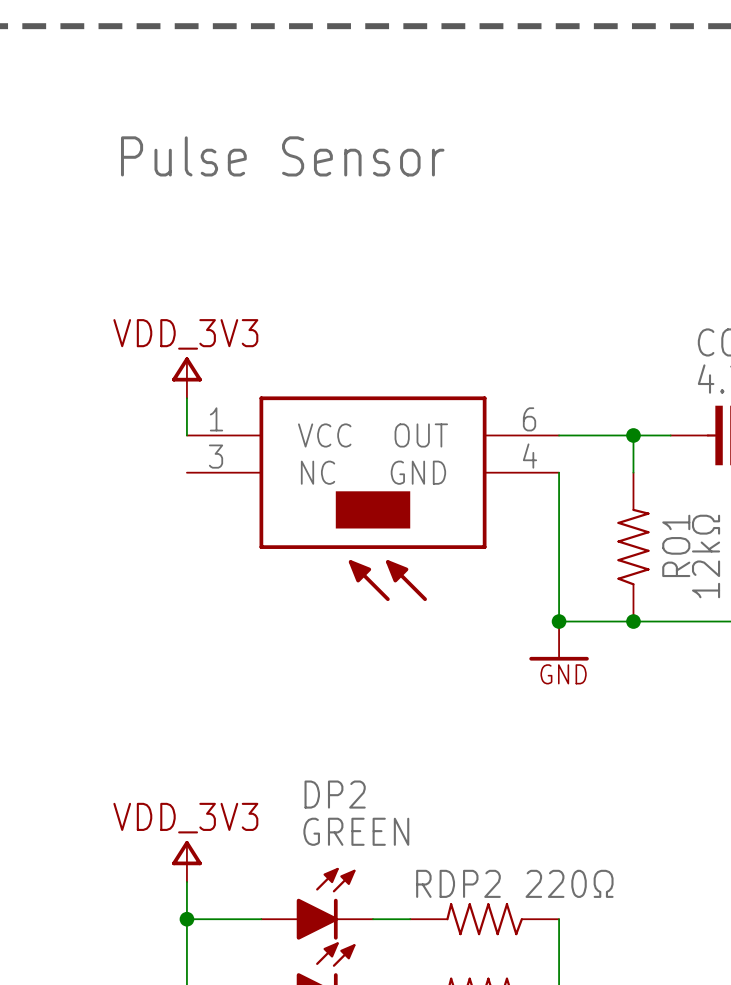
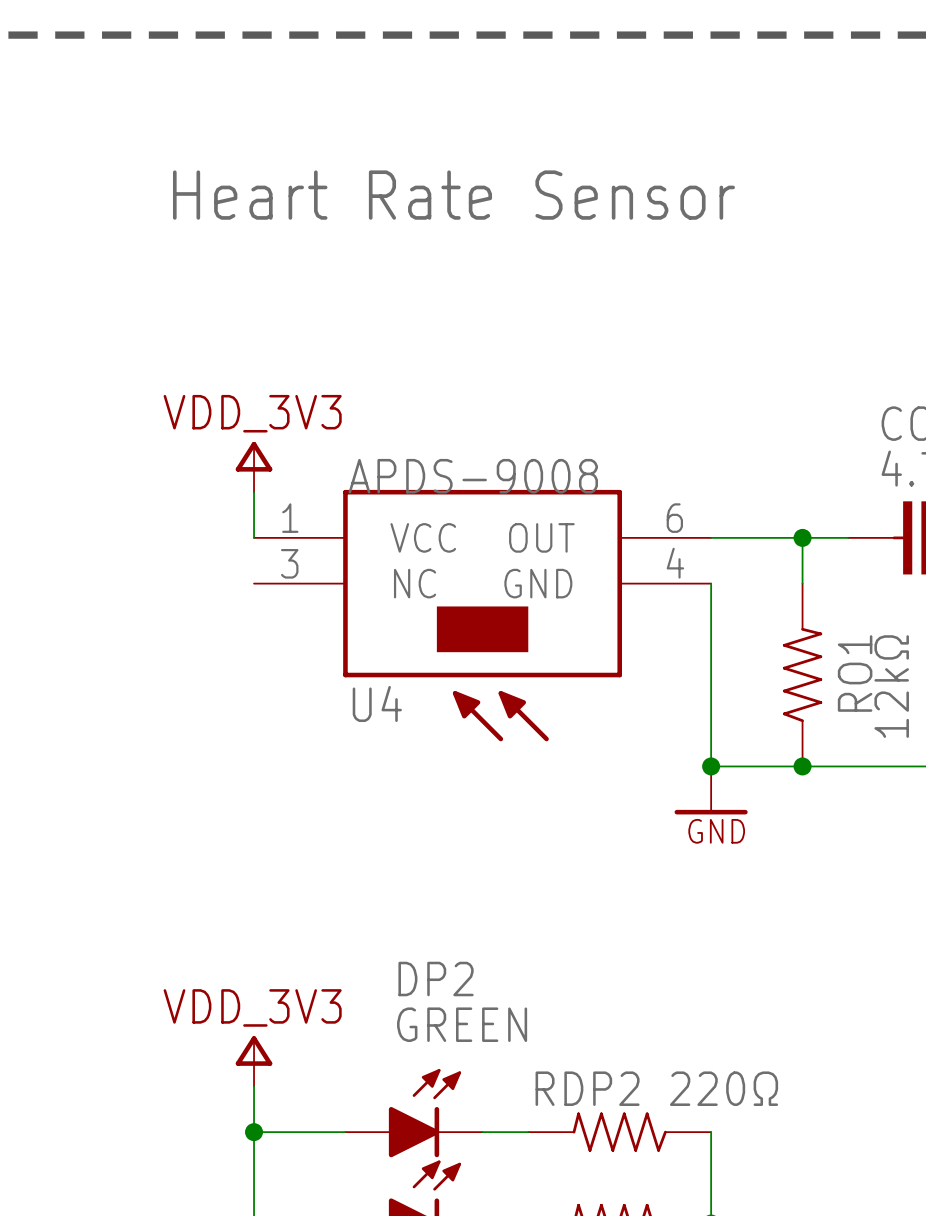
text: Pulse Sensor (282, 156) -> Heart Rate Sensor (453, 195)
U4 value: none -> APDS-9008 (473, 476)
U4 name: none -> U4 (377, 703)

